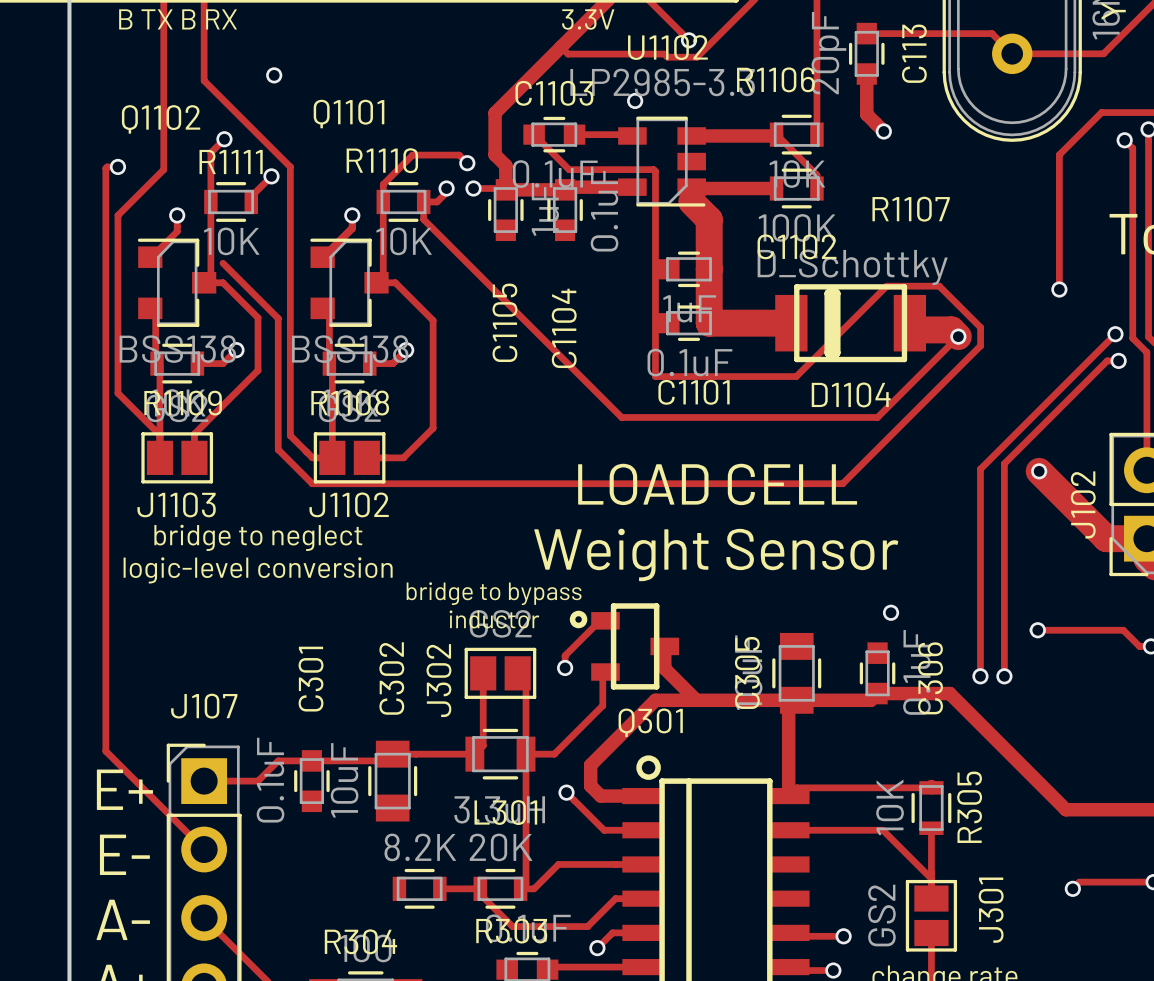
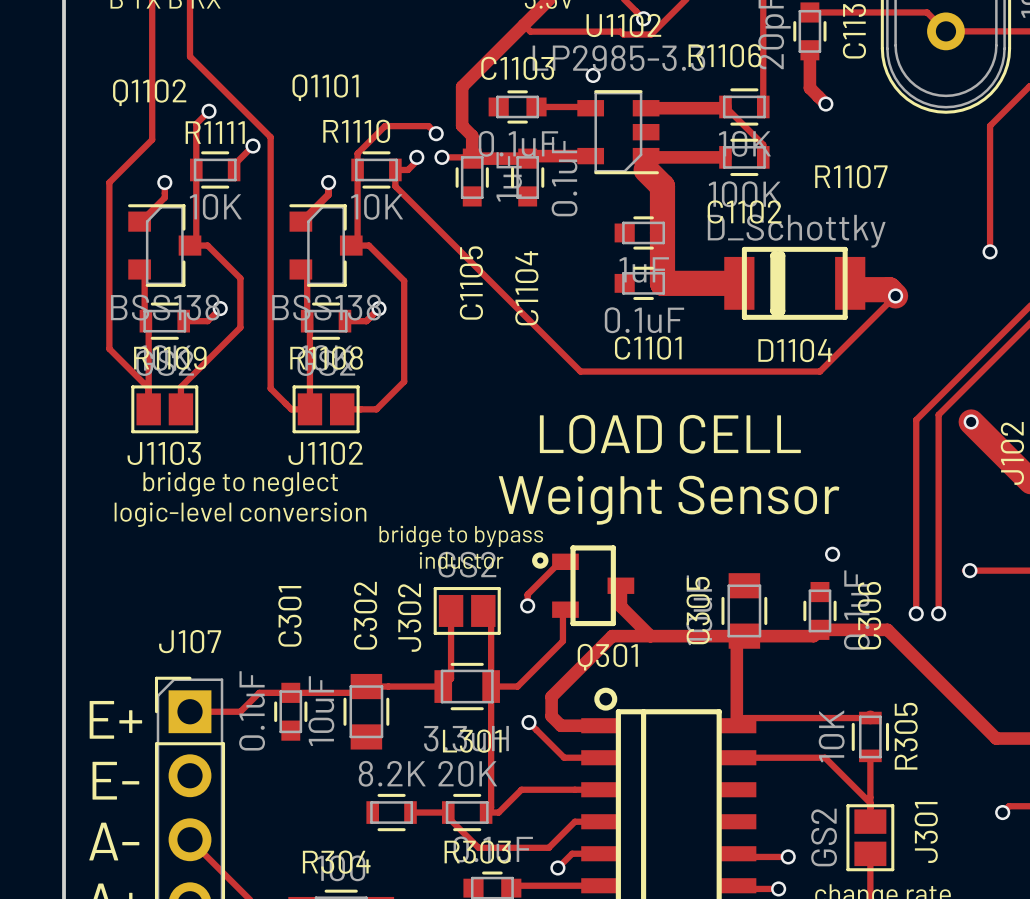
via: (274, 75) -> none
track: (534, 134) (569, 169) (653, 169) (655, 171) (655, 376) (796, 376) (886, 286) (939, 286) (980, 327) (980, 345) (842, 483) (312, 483) (278, 449) (278, 318) (223, 263) -> none
track: (117, 166) (105, 168) (105, 751) (204, 849) -> none
via: (117, 166) -> none

